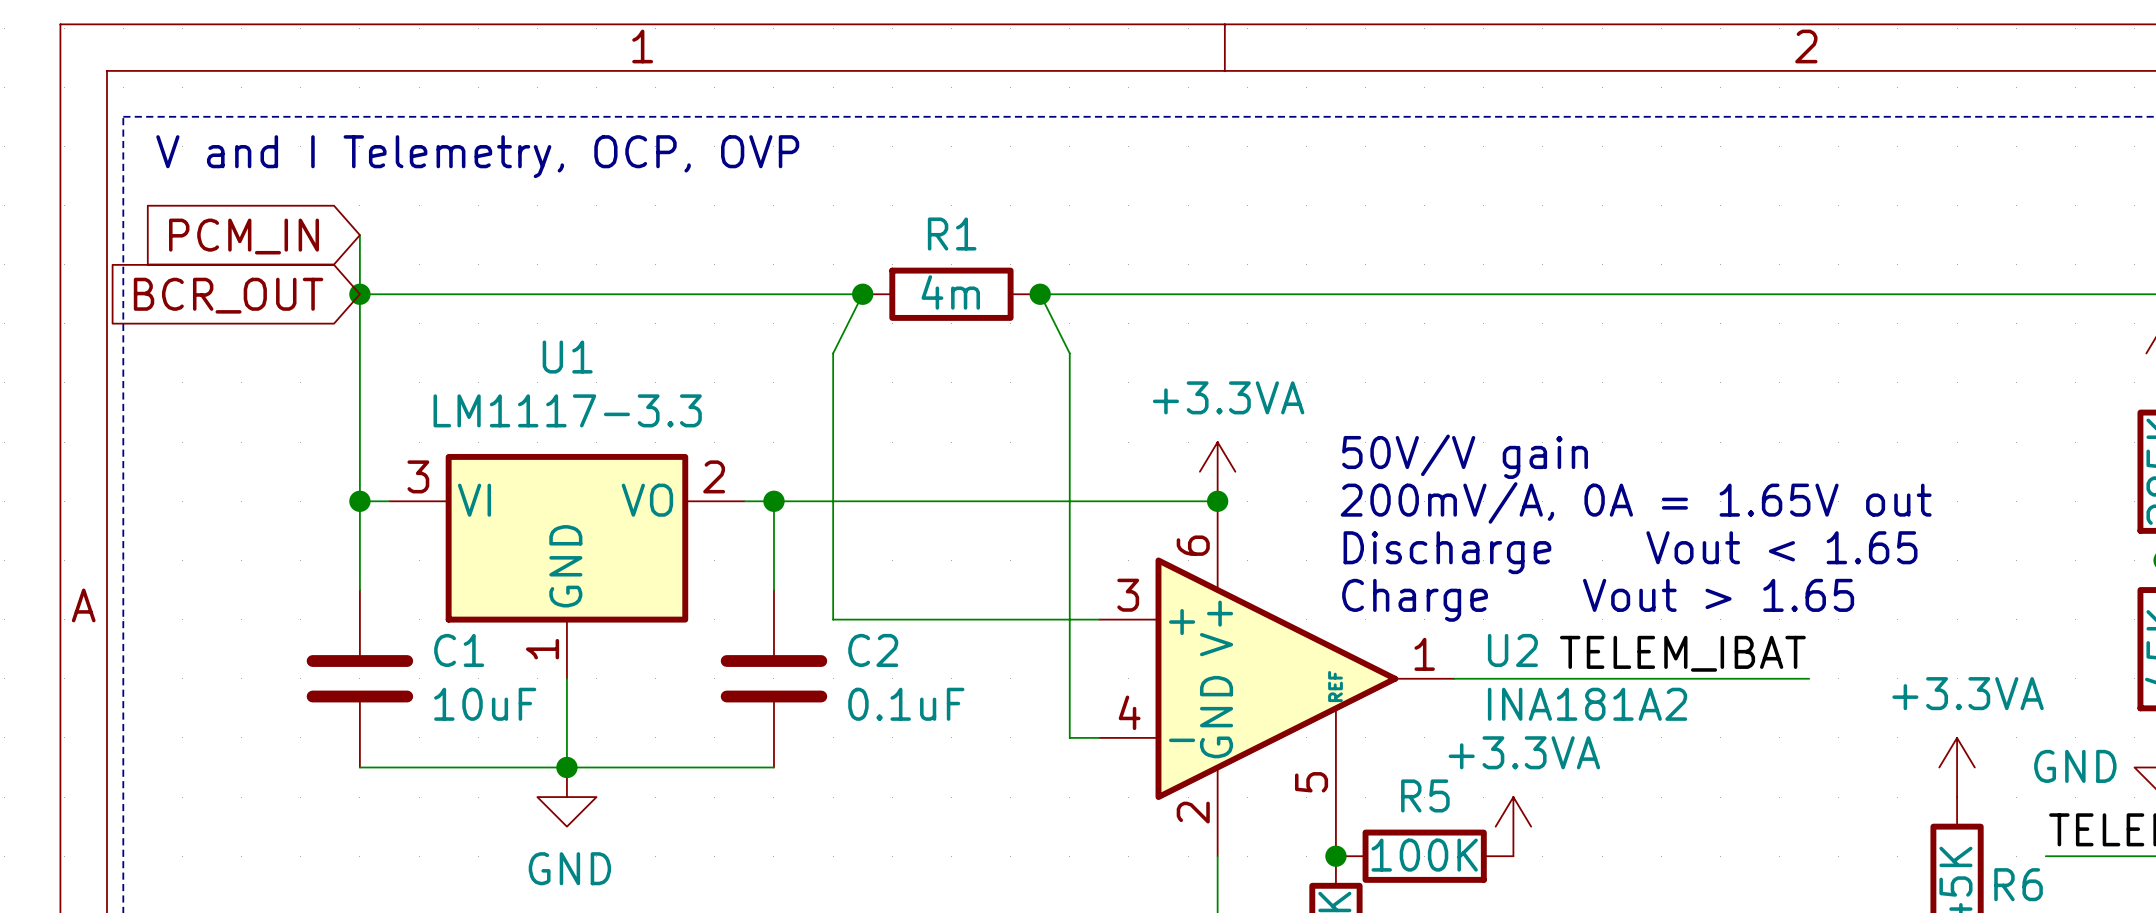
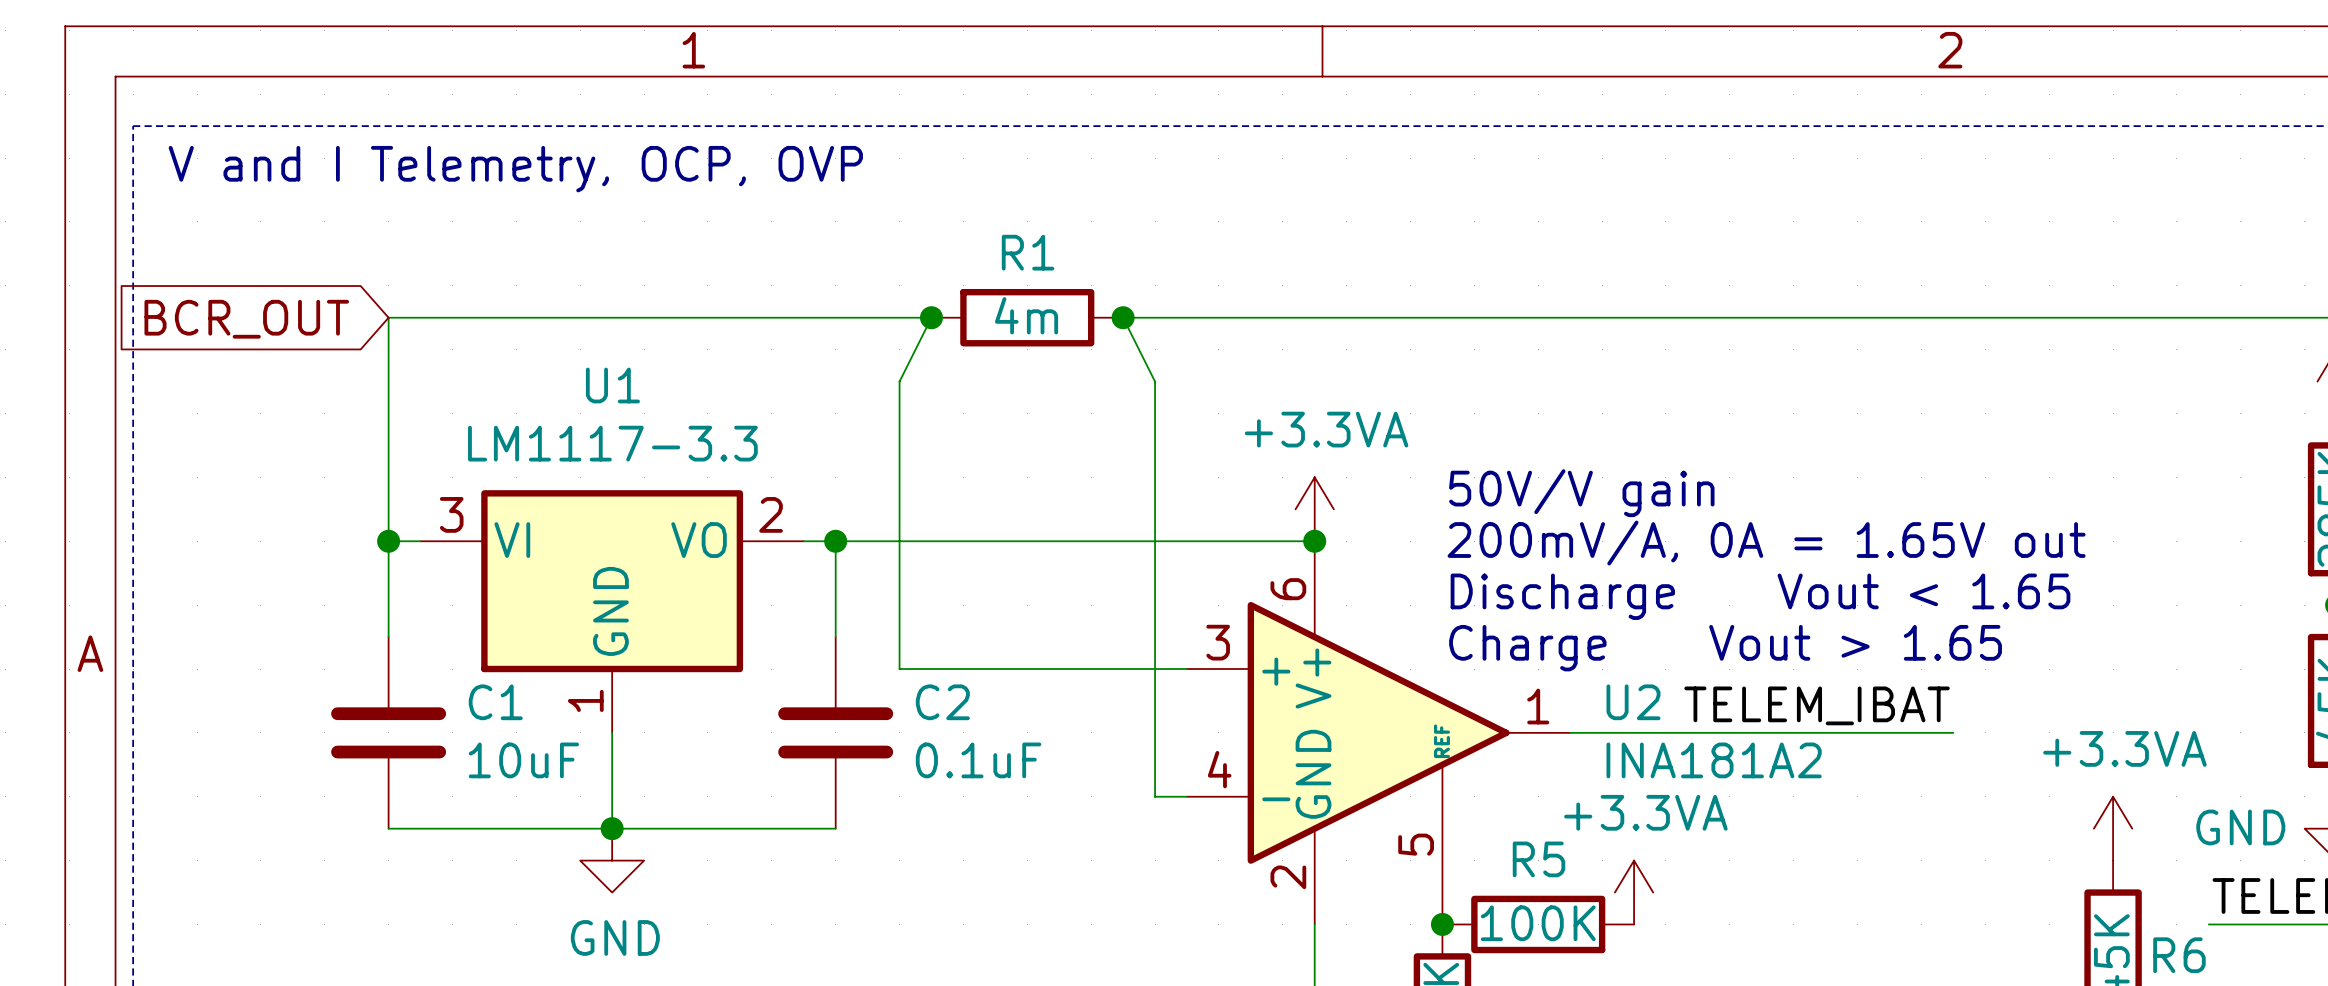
wire: (359, 235) (359, 294) -> none
global label: PCM_IN (244, 236) -> none
junction: (359, 294) -> none

